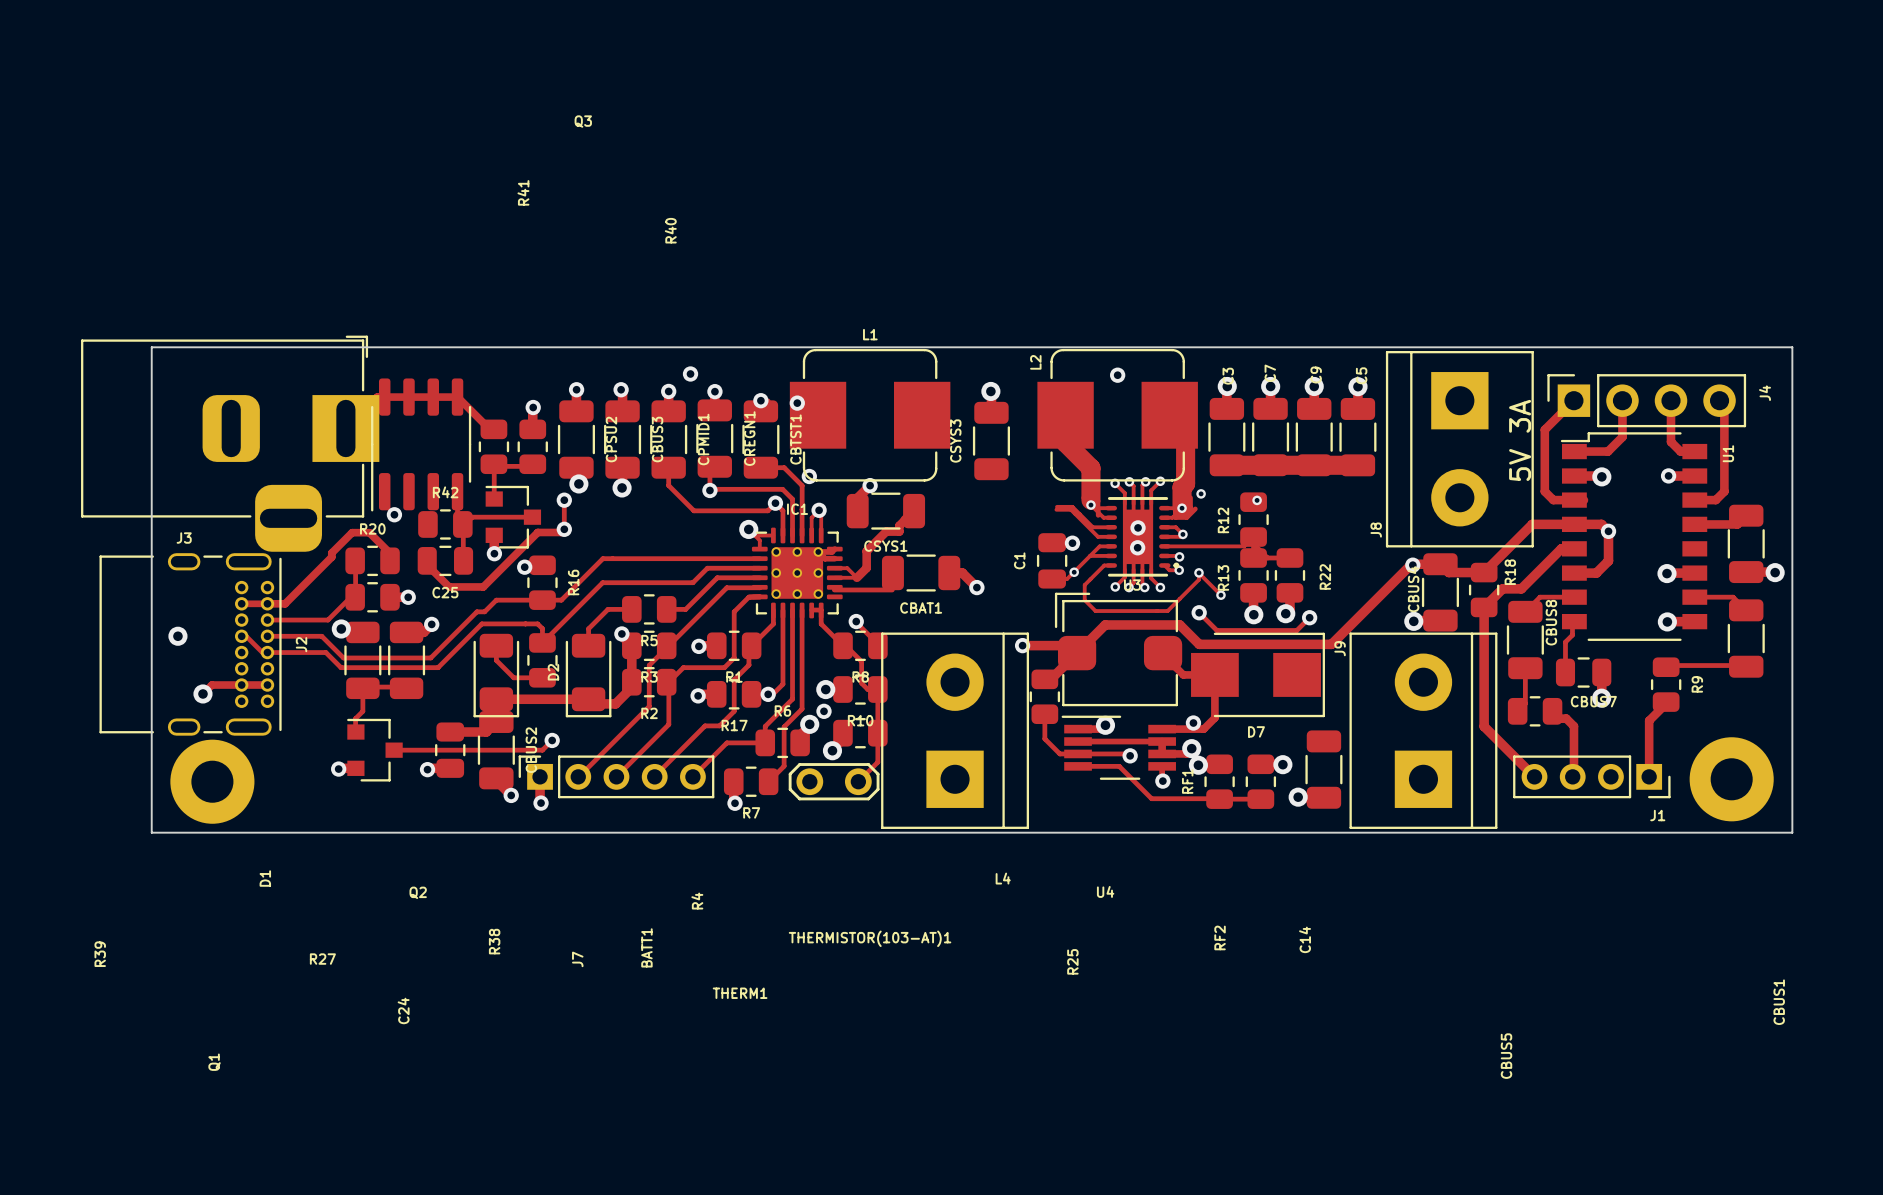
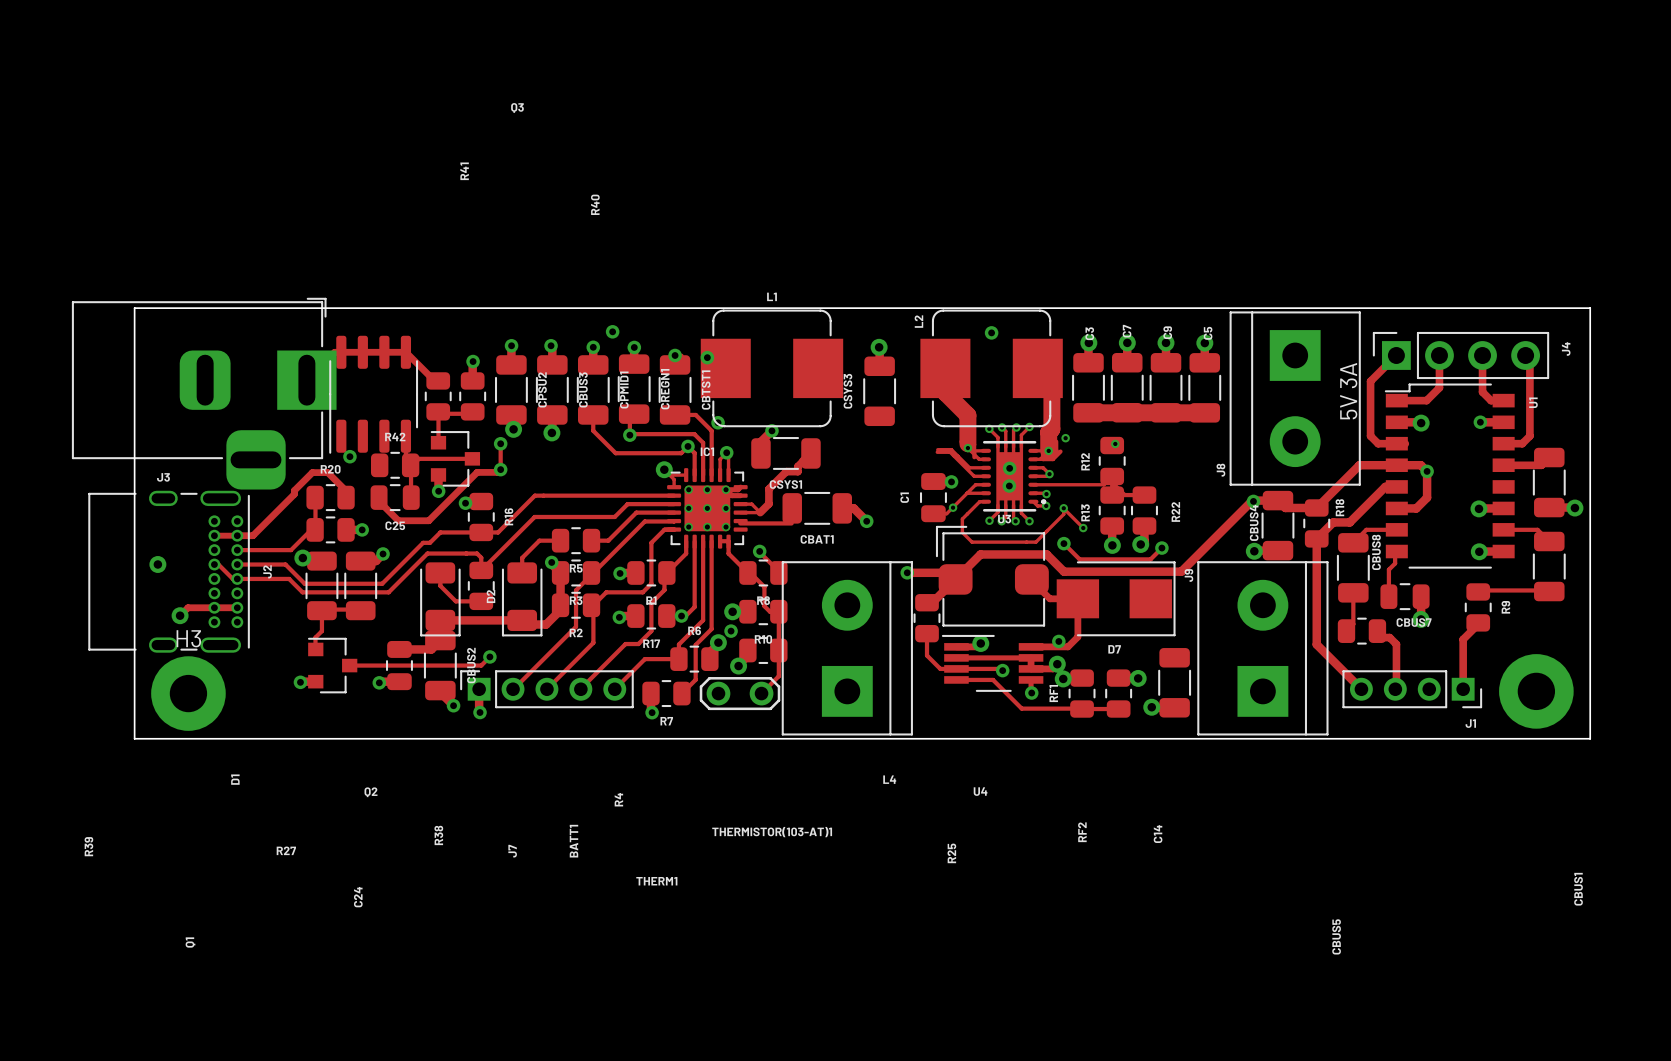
H3 name: none -> H3 (188, 638)

